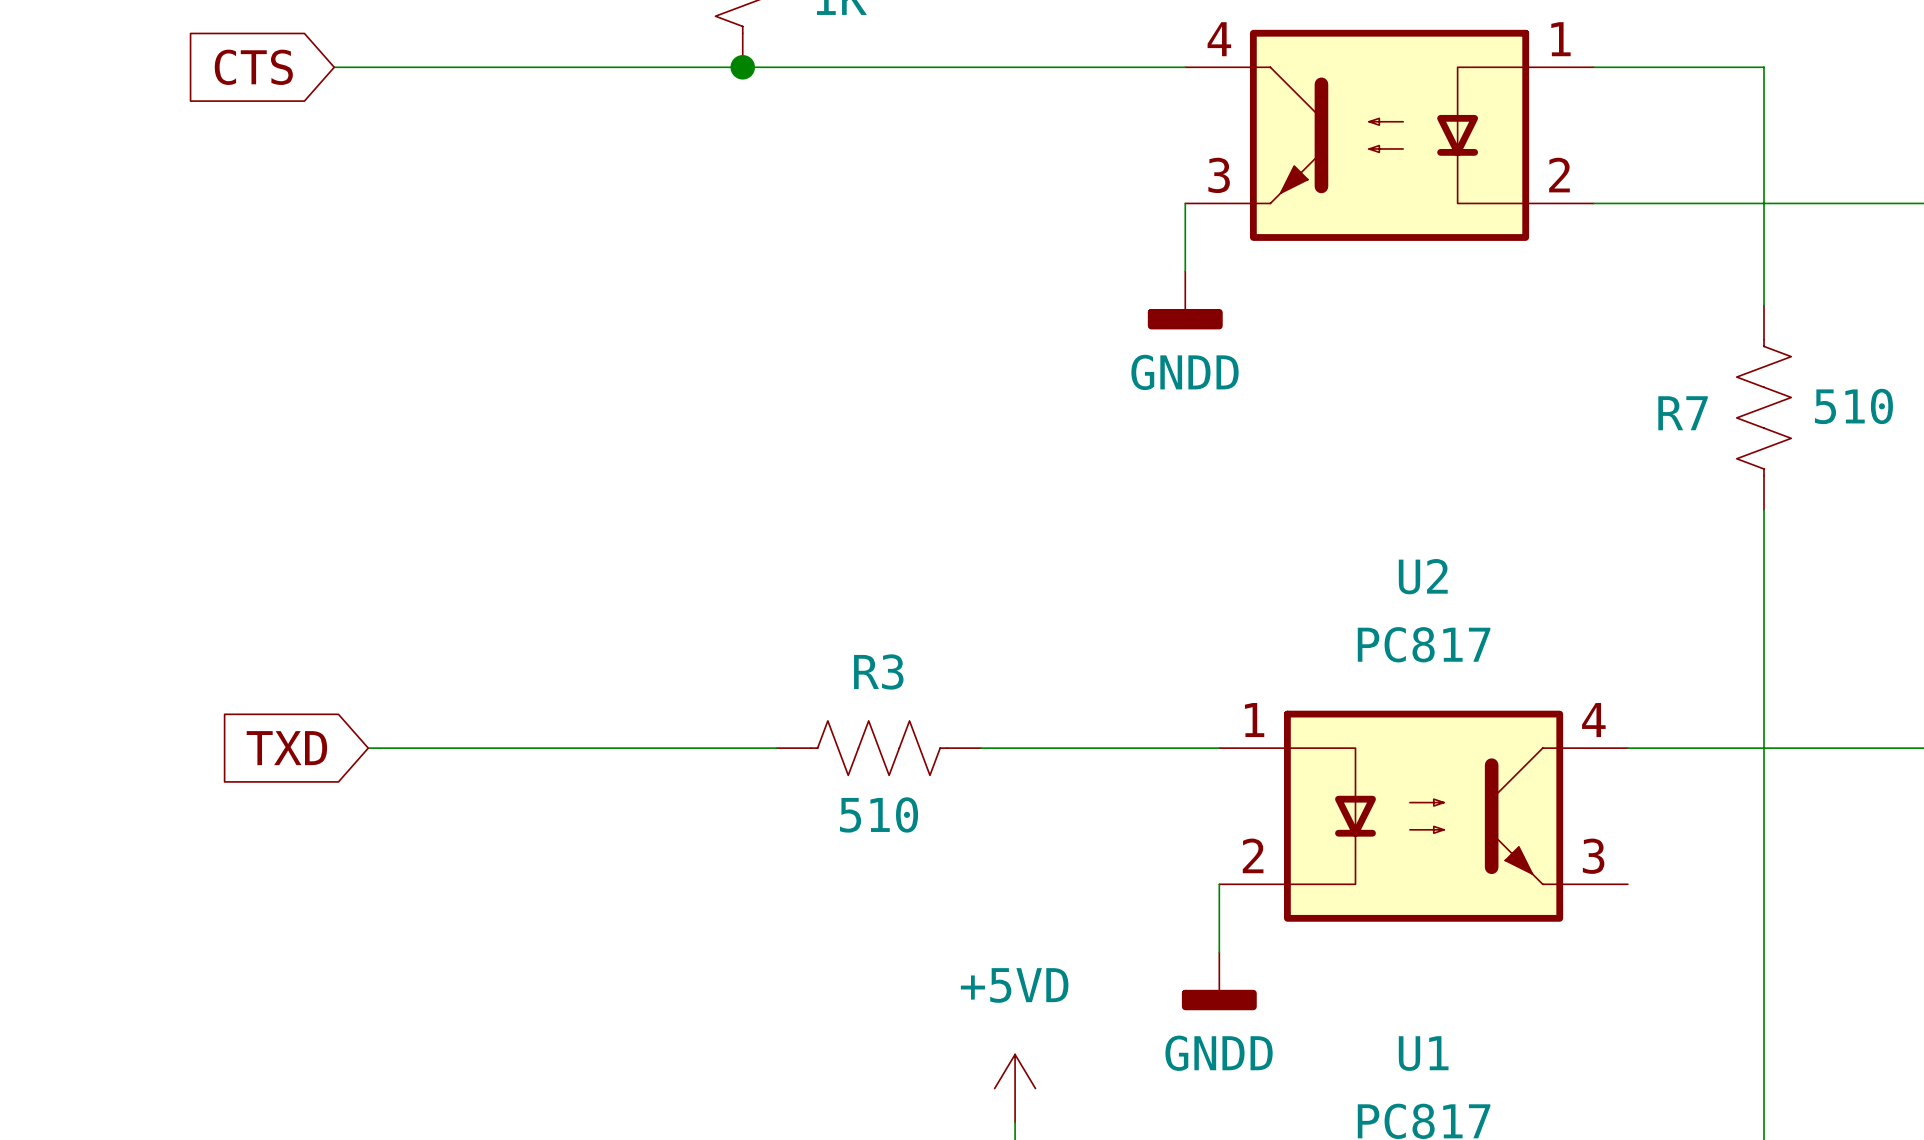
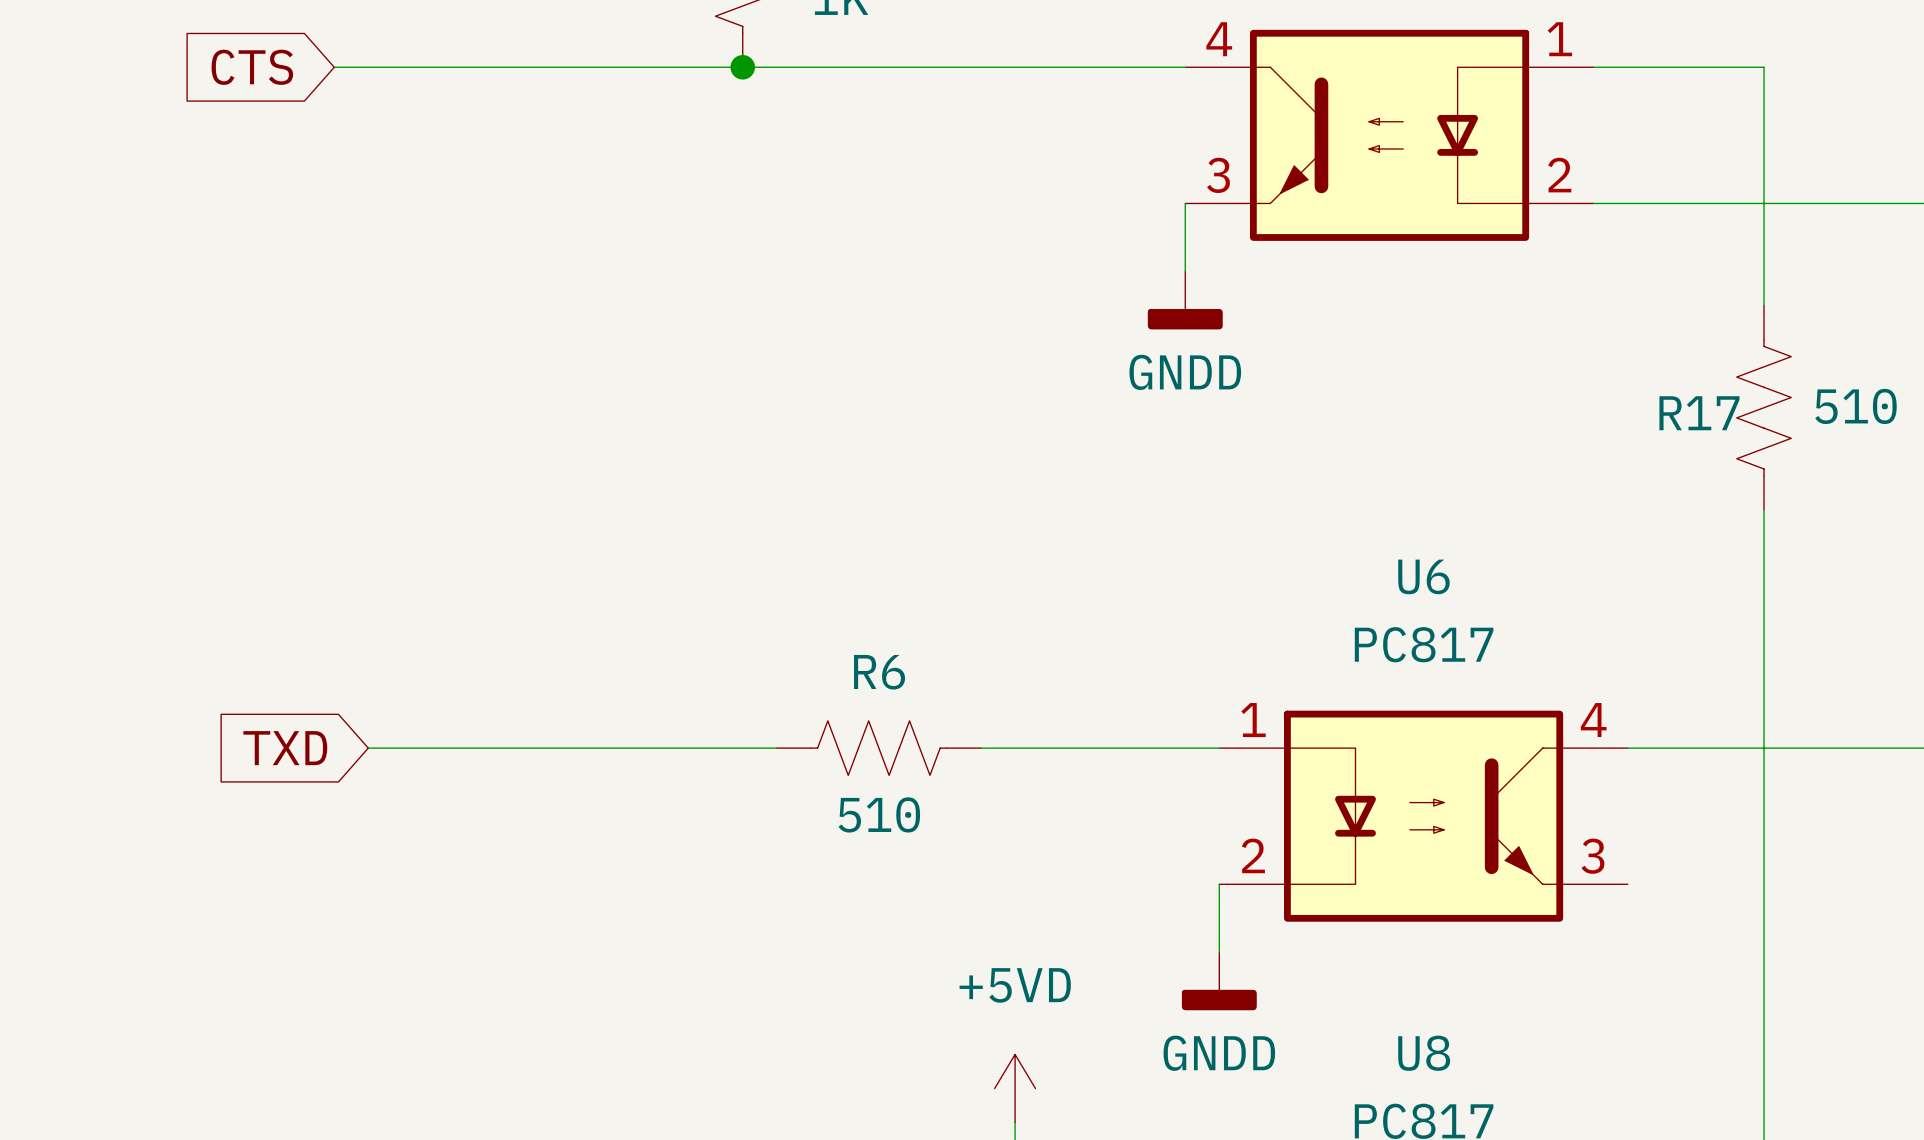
R7 name: R7 (1683, 413) -> R17 (1699, 413)
U2 name: U2 (1423, 576) -> U6 (1423, 576)
R3 name: R3 (878, 671) -> R6 (879, 672)
U1 name: U1 (1423, 1053) -> U8 (1424, 1053)

